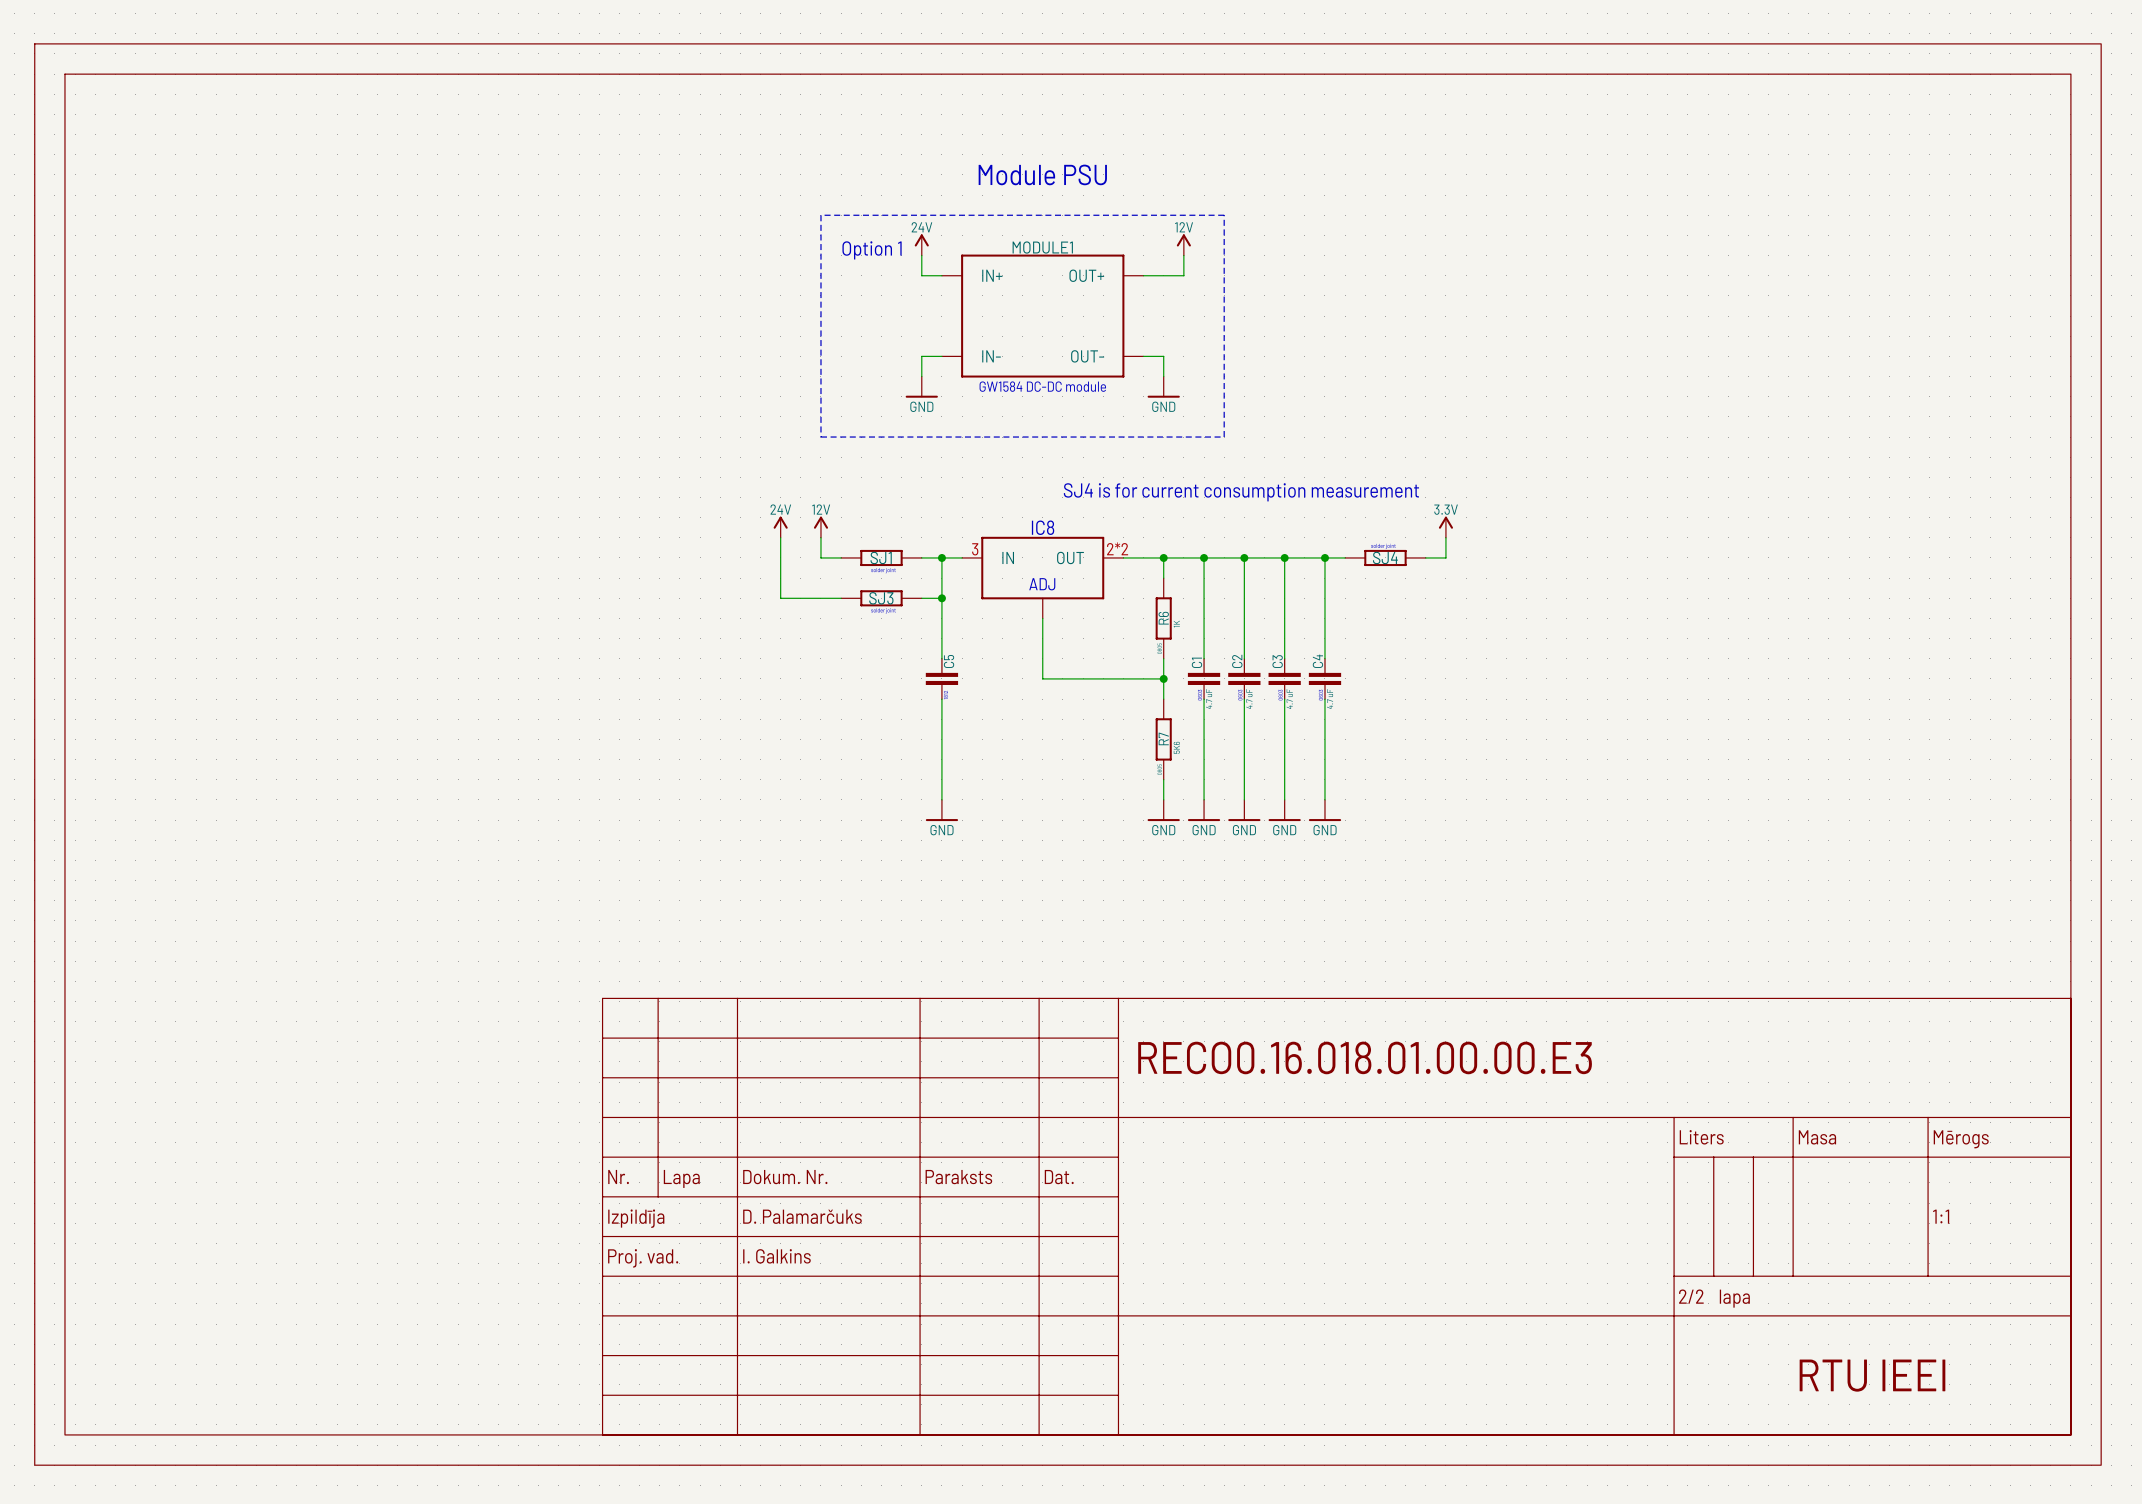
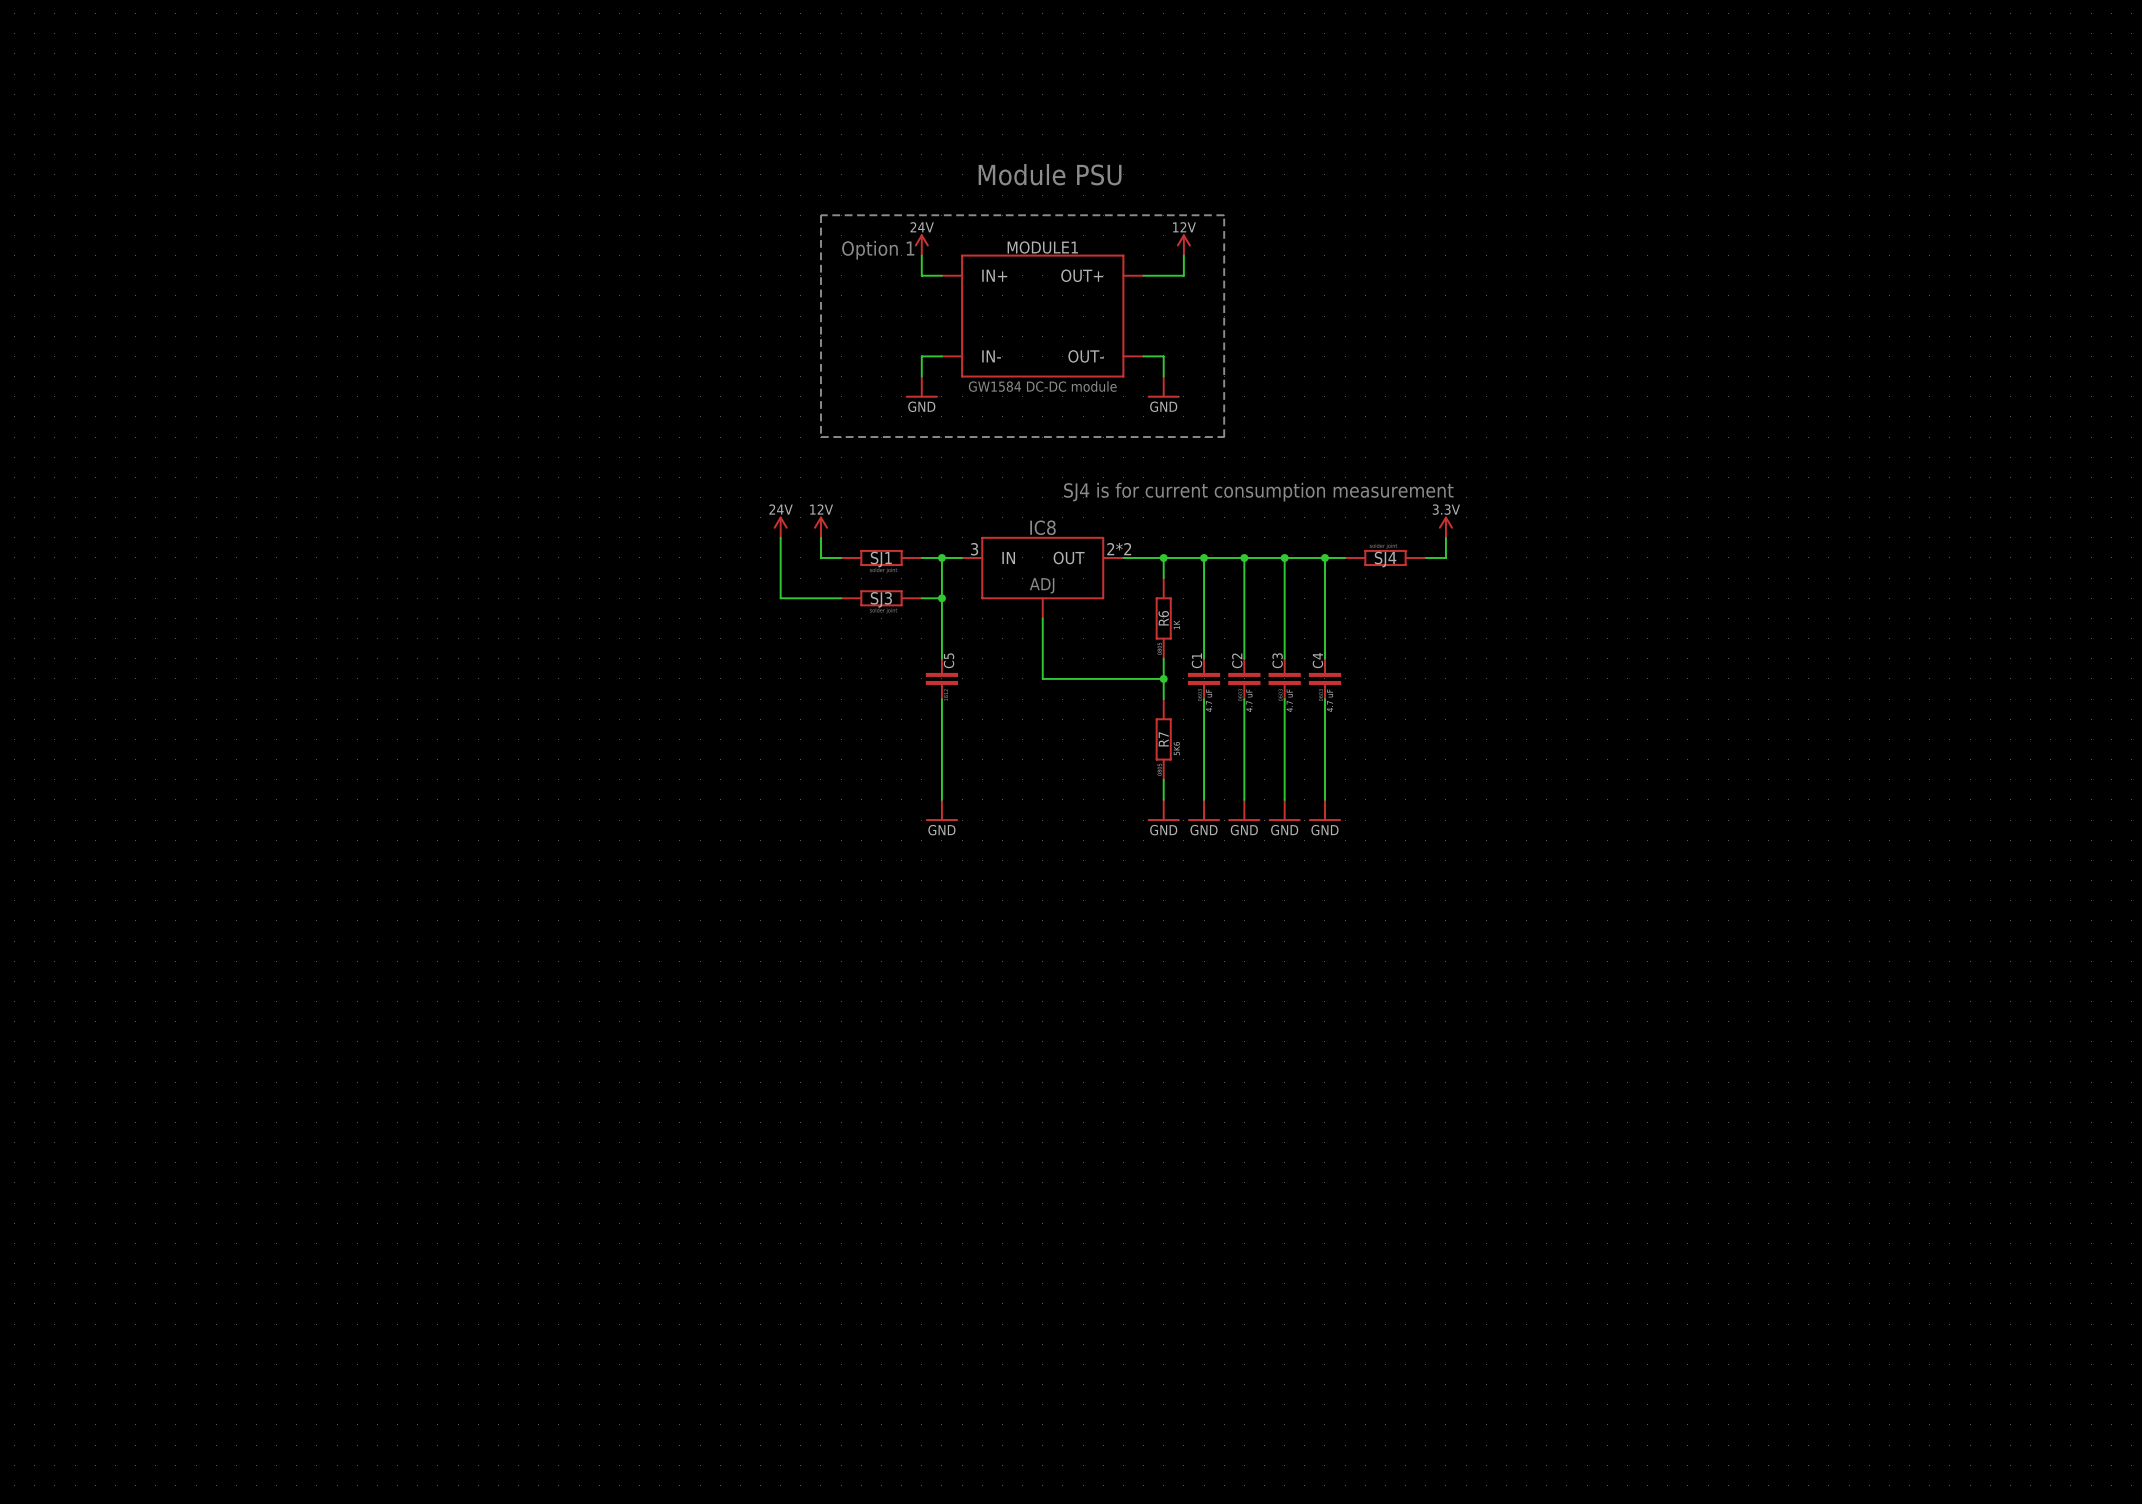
part: (1067, 754) -> none

